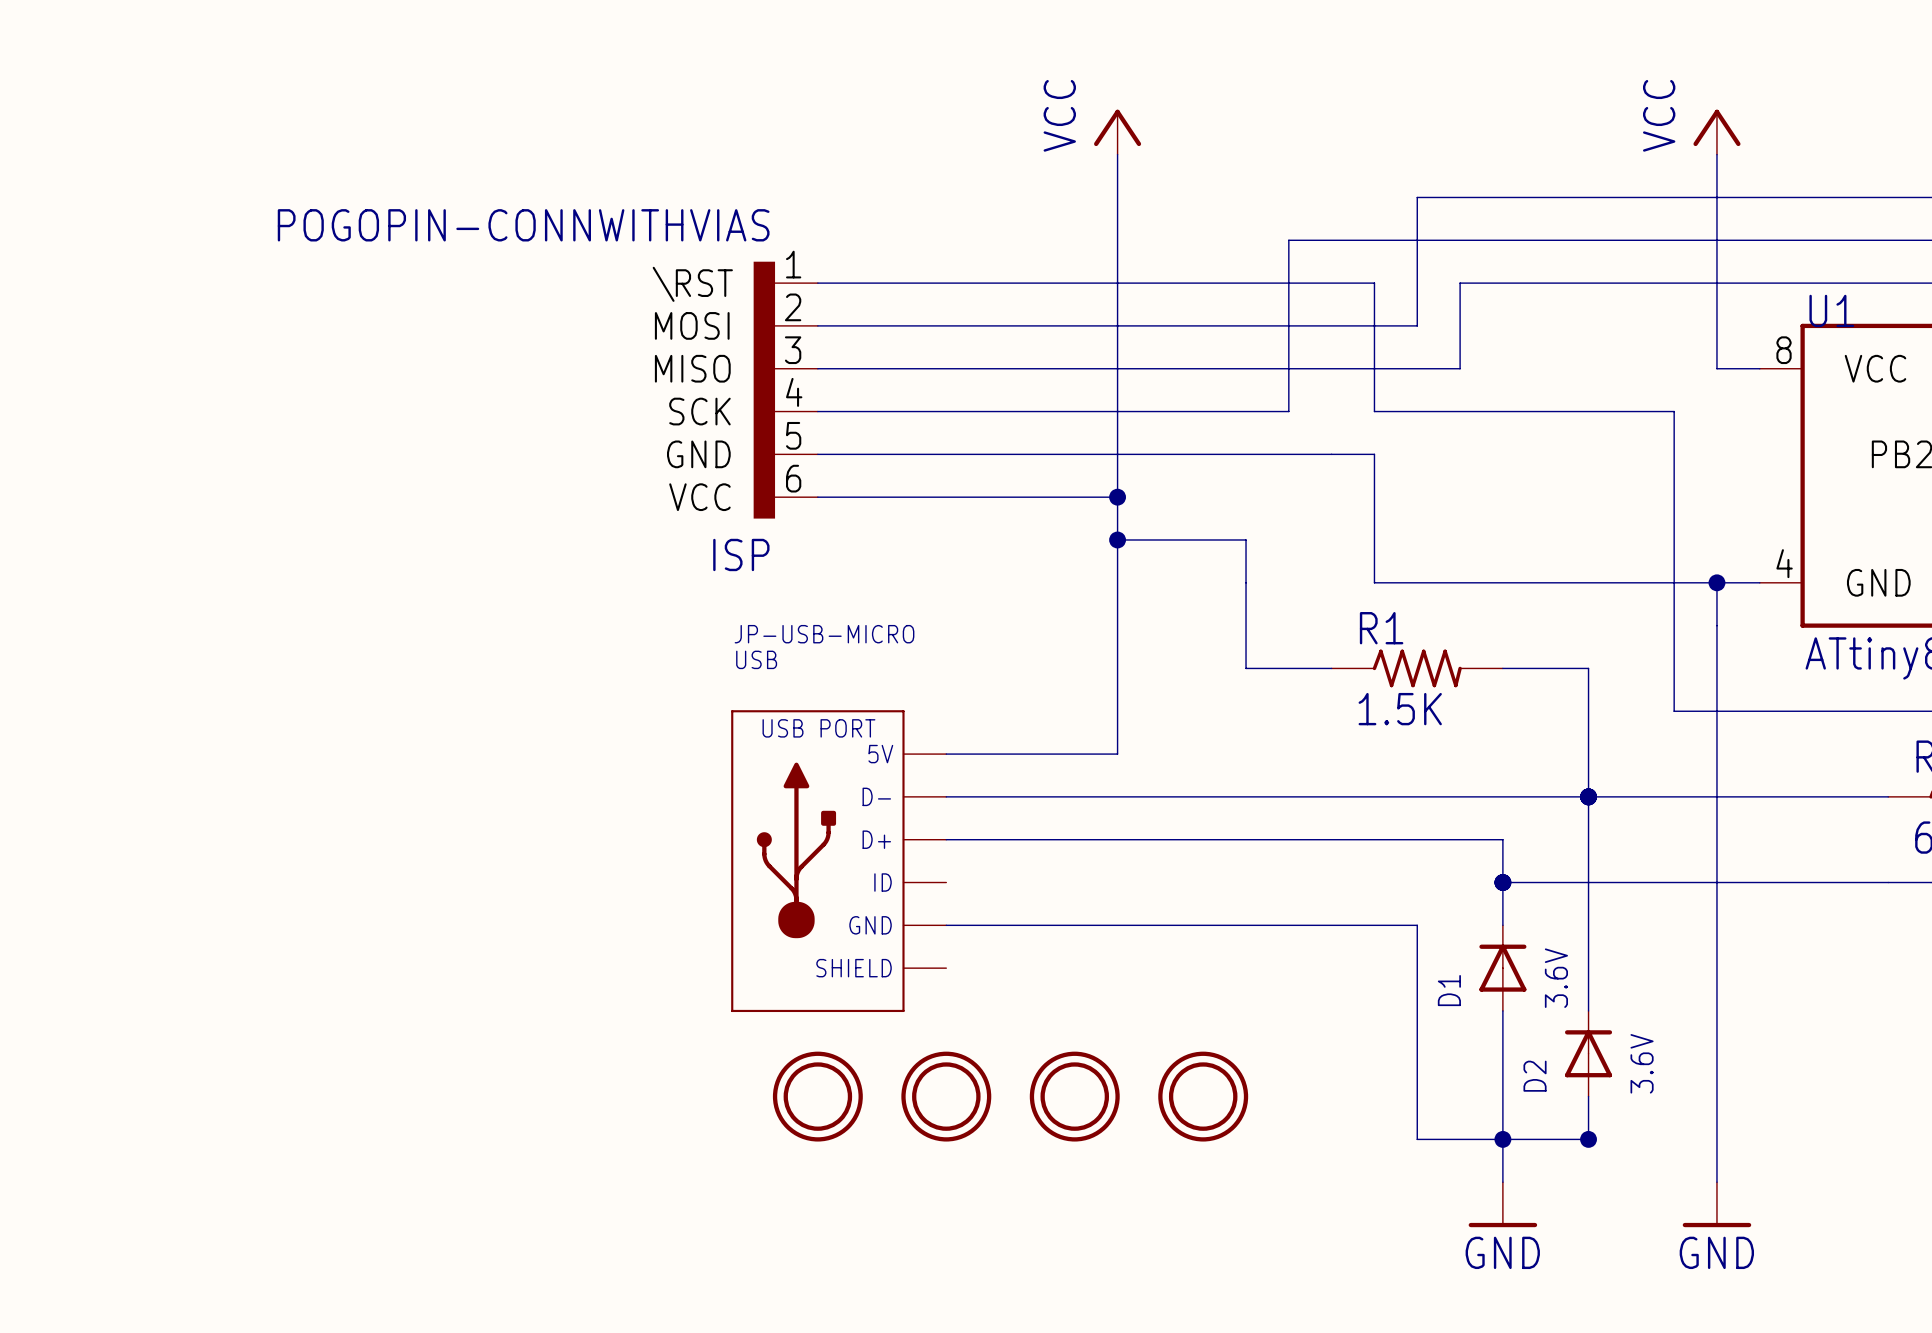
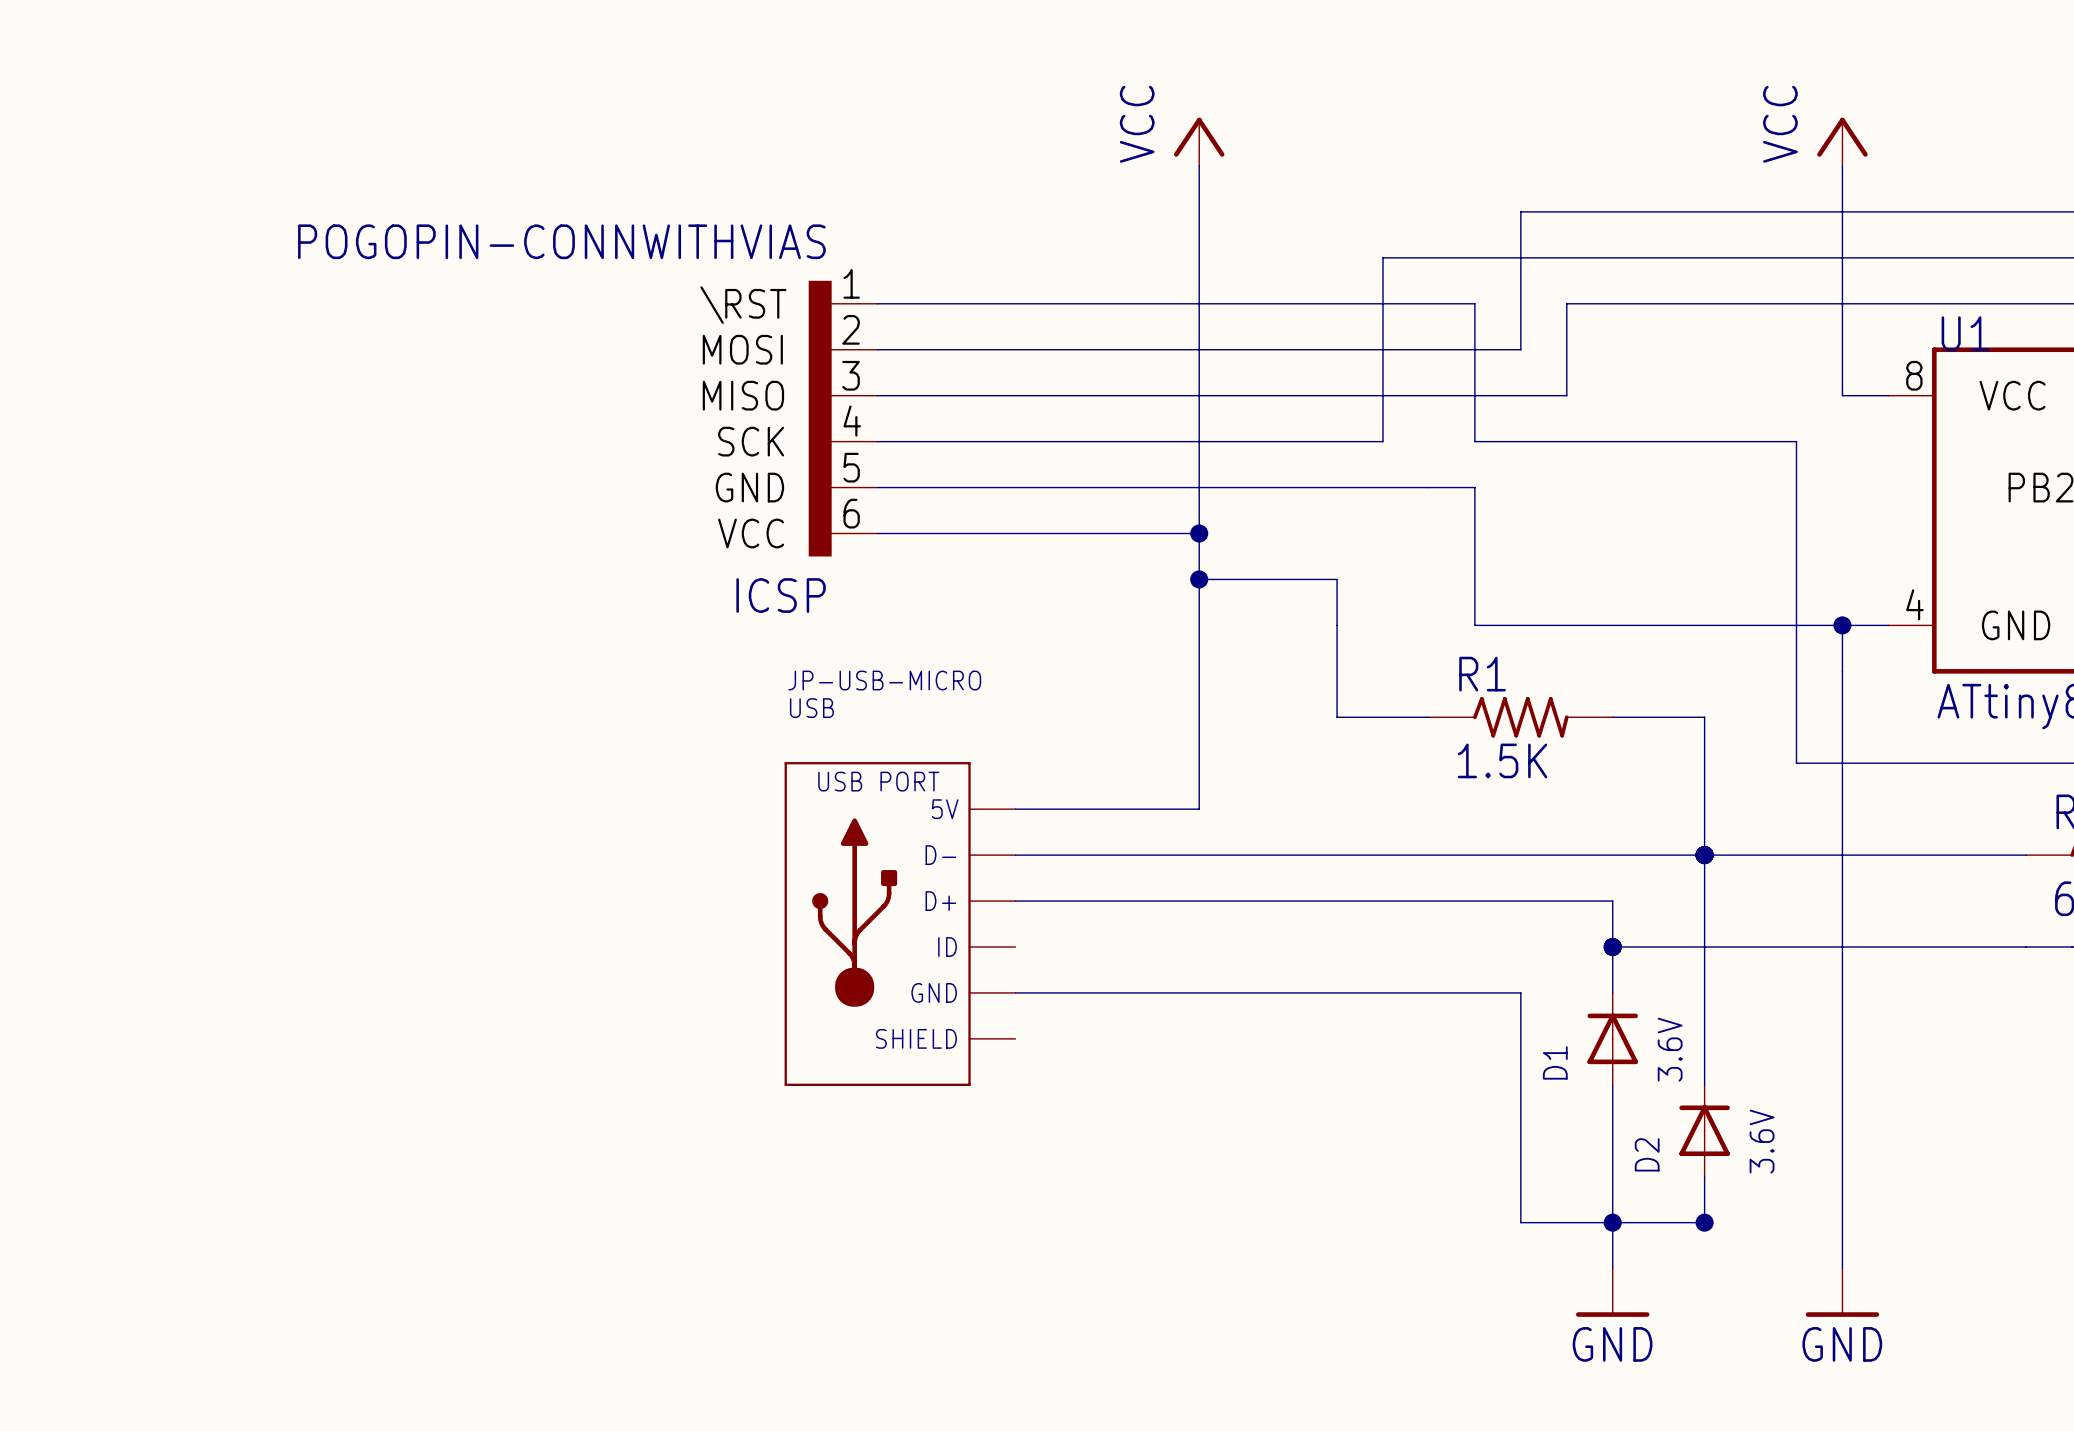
ISP name: ISP (741, 554) -> ICSP (781, 595)
part: (817, 1096) -> none
part: (946, 1096) -> none
part: (1074, 1096) -> none
part: (1203, 1096) -> none

